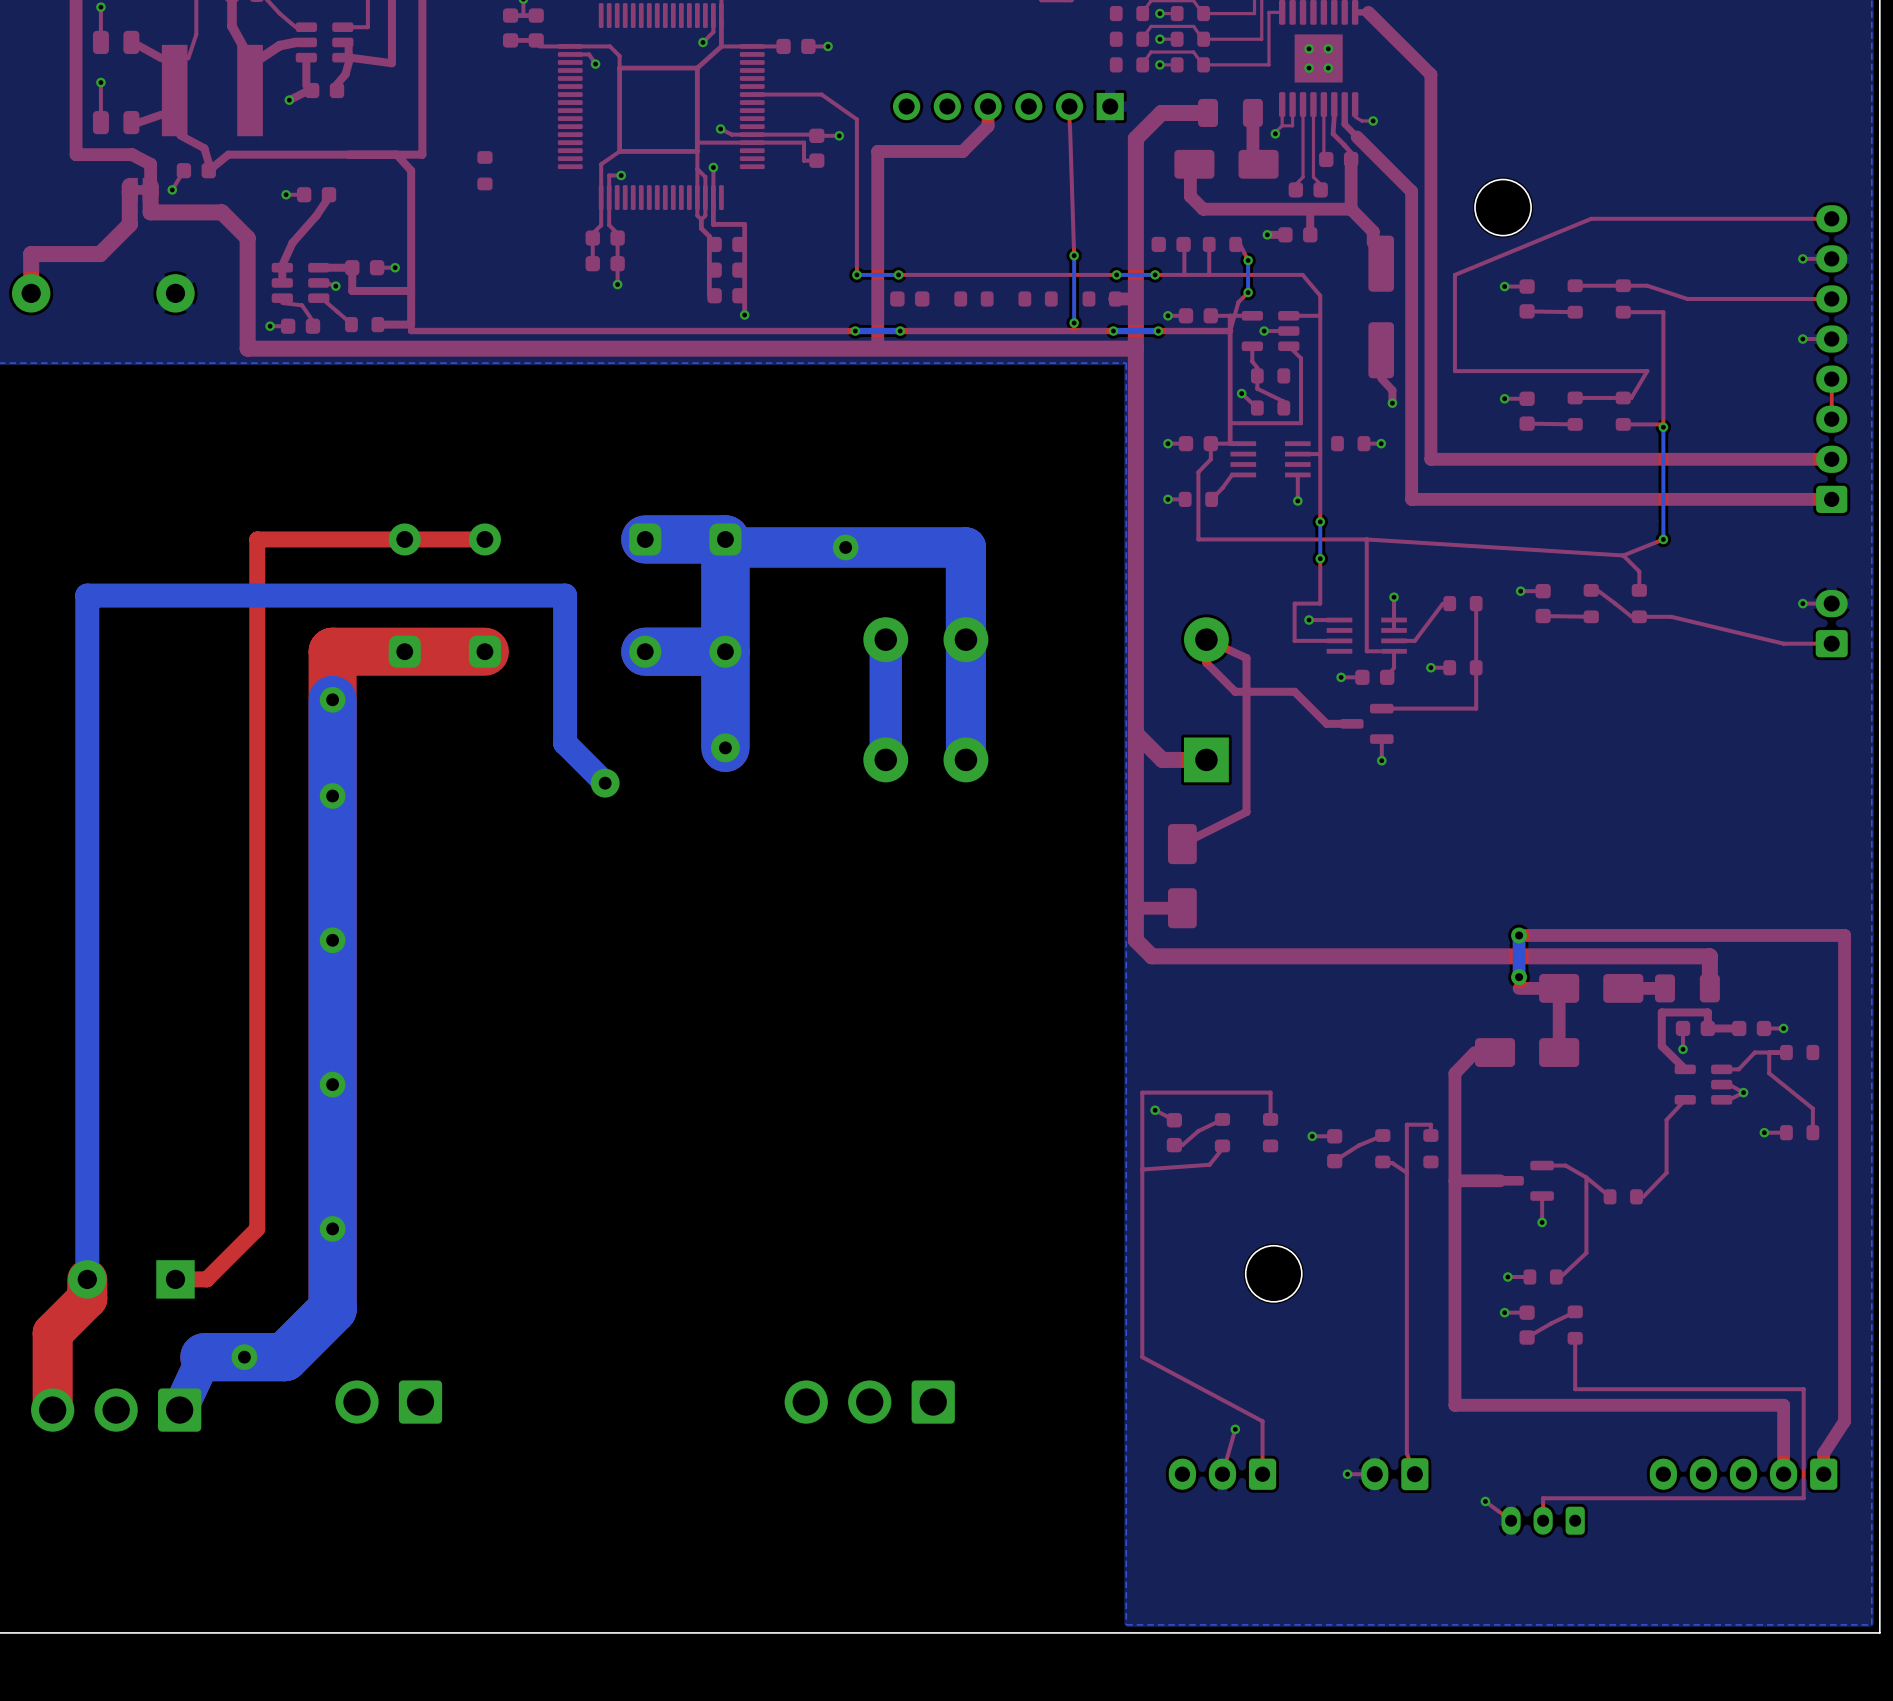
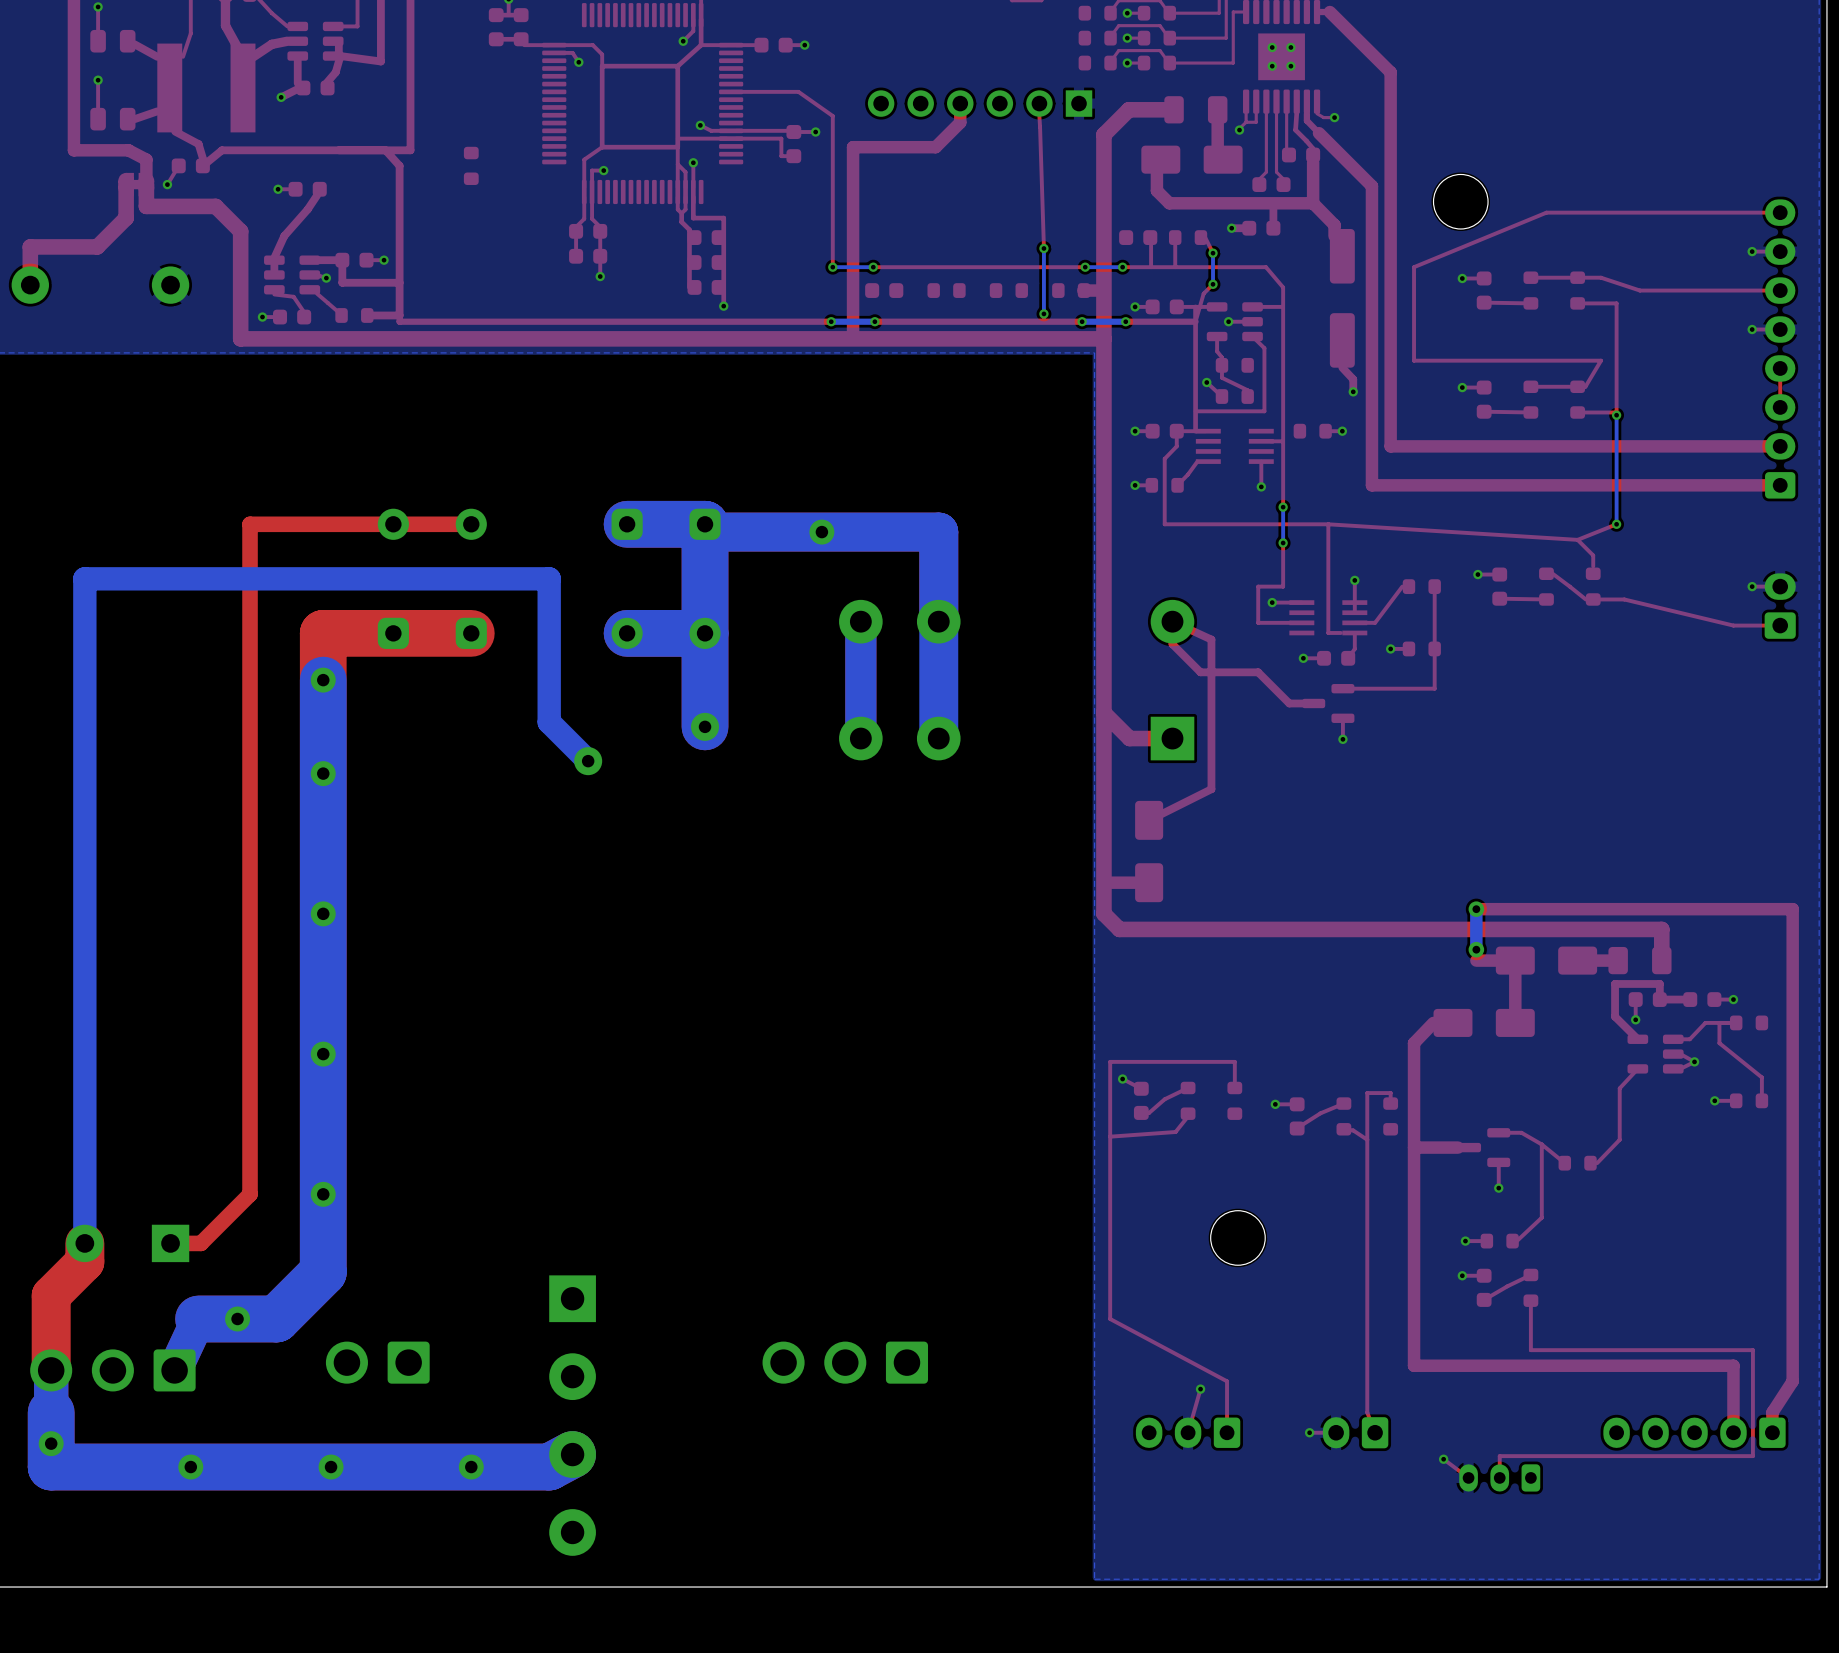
bottom track: none -> (51, 1370) (51, 1467) (549, 1467) (572, 1454)
part: none -> (572, 1415)
via: none -> (51, 1443)
via: none -> (190, 1467)
via: none -> (331, 1467)
via: none -> (471, 1467)

